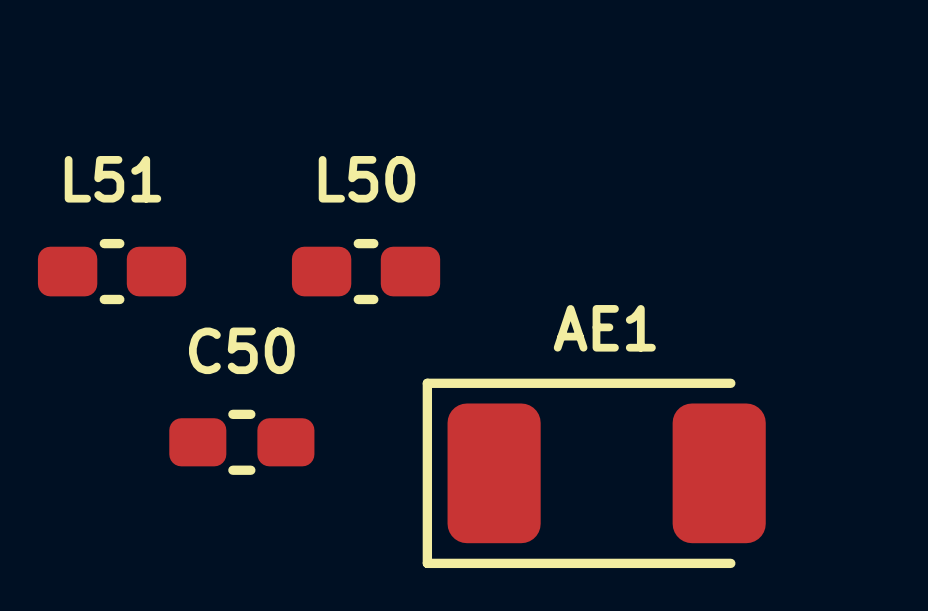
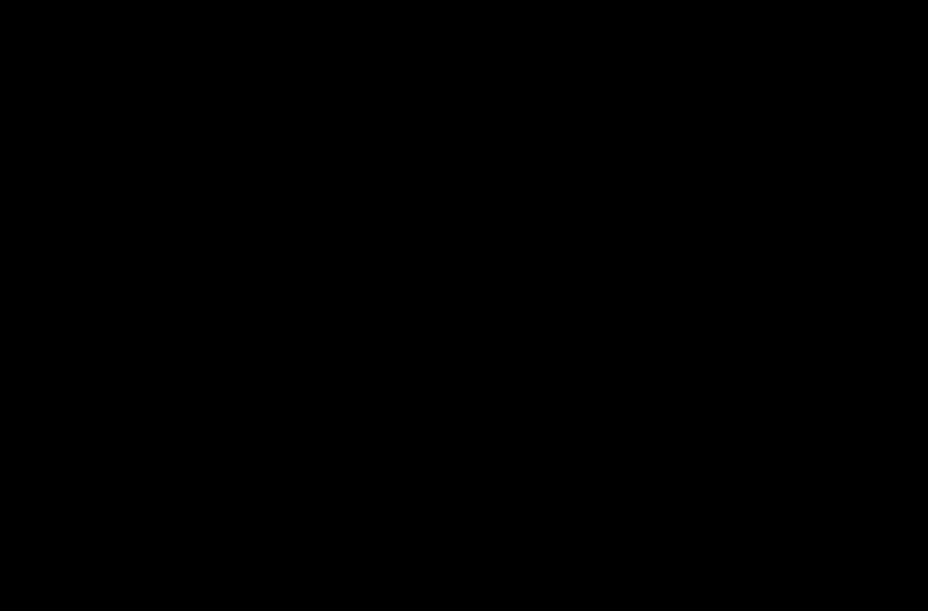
L51: (112, 271) -> none
L50: (366, 271) -> none
C50: (241, 442) -> none
AE1: (594, 473) -> none

